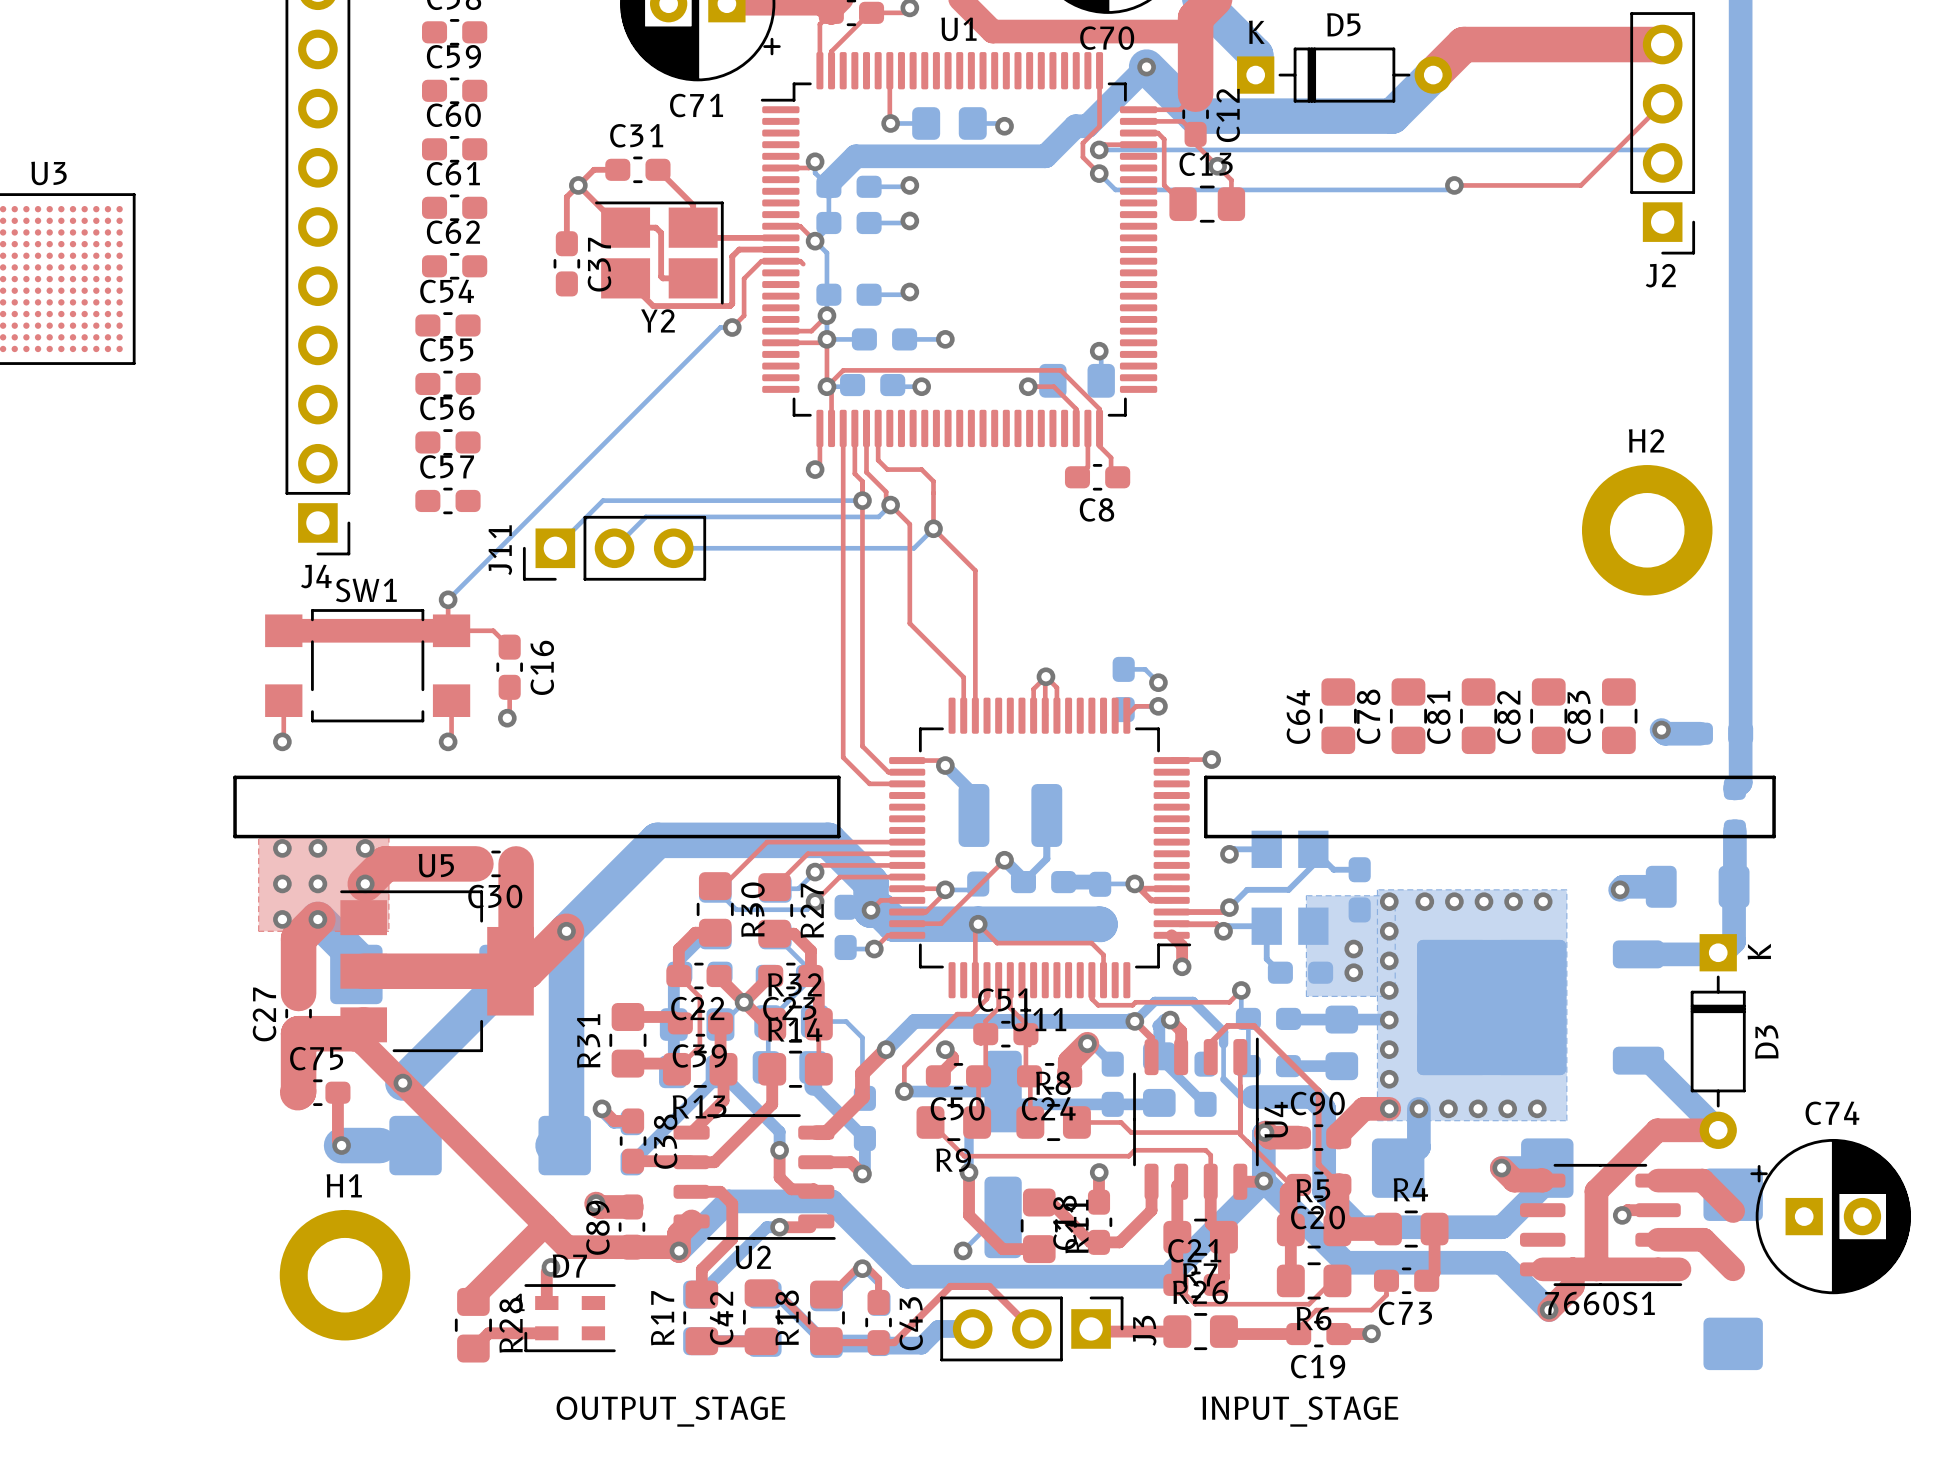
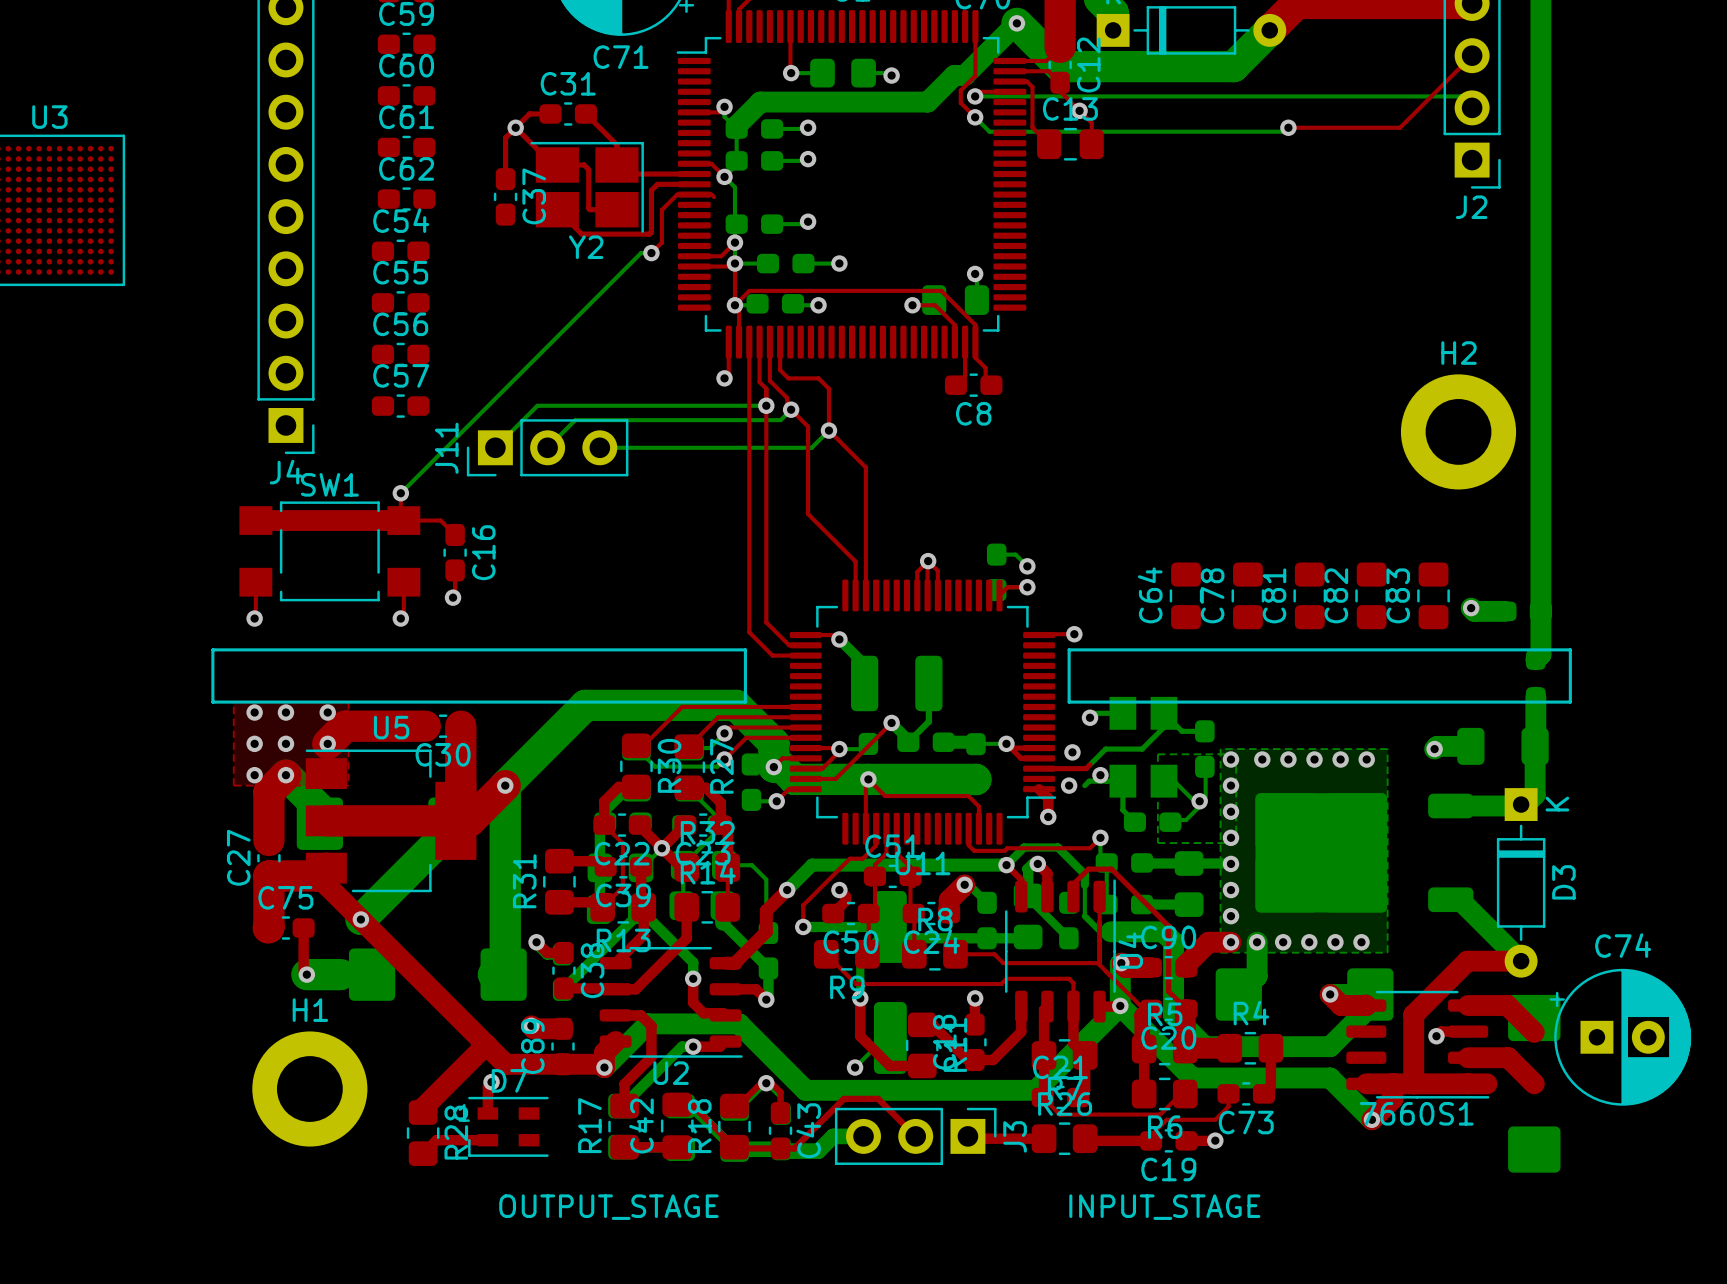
via: none -> (1072, 752)
via: (1229, 907) -> none
via: none -> (1100, 775)
bottom track: none -> (1205, 775) (1205, 800) (1186, 820) (1165, 820)
top track: (1179, 924) (1216, 924) (1223, 931) -> none
bottom track: none -> (1163, 781) (1174, 781) (1199, 806)
via: none -> (1069, 785)
via: (1223, 931) -> none
via: (1353, 972) -> none

